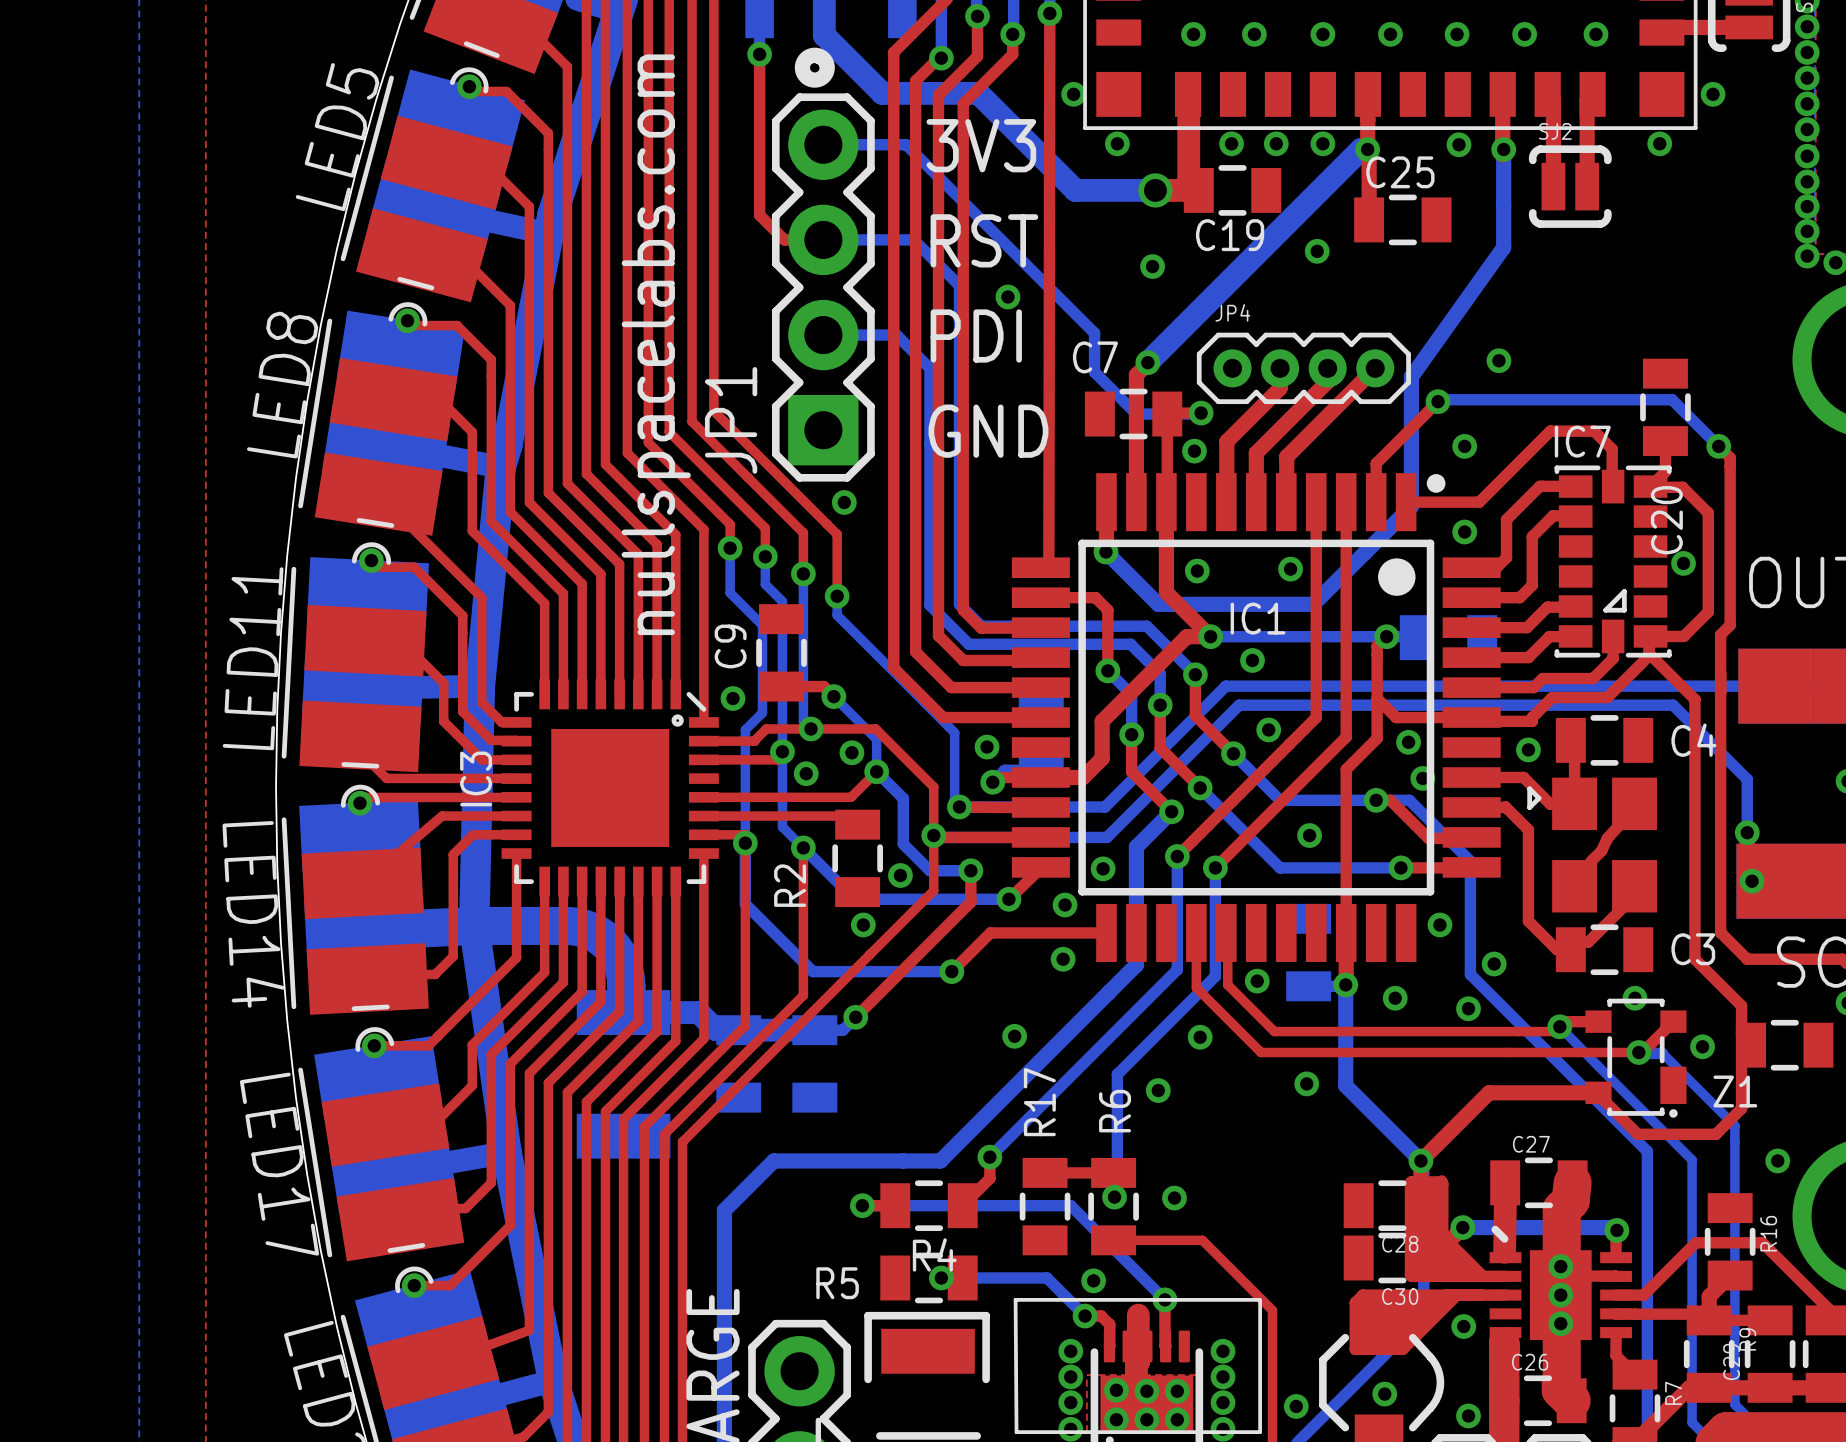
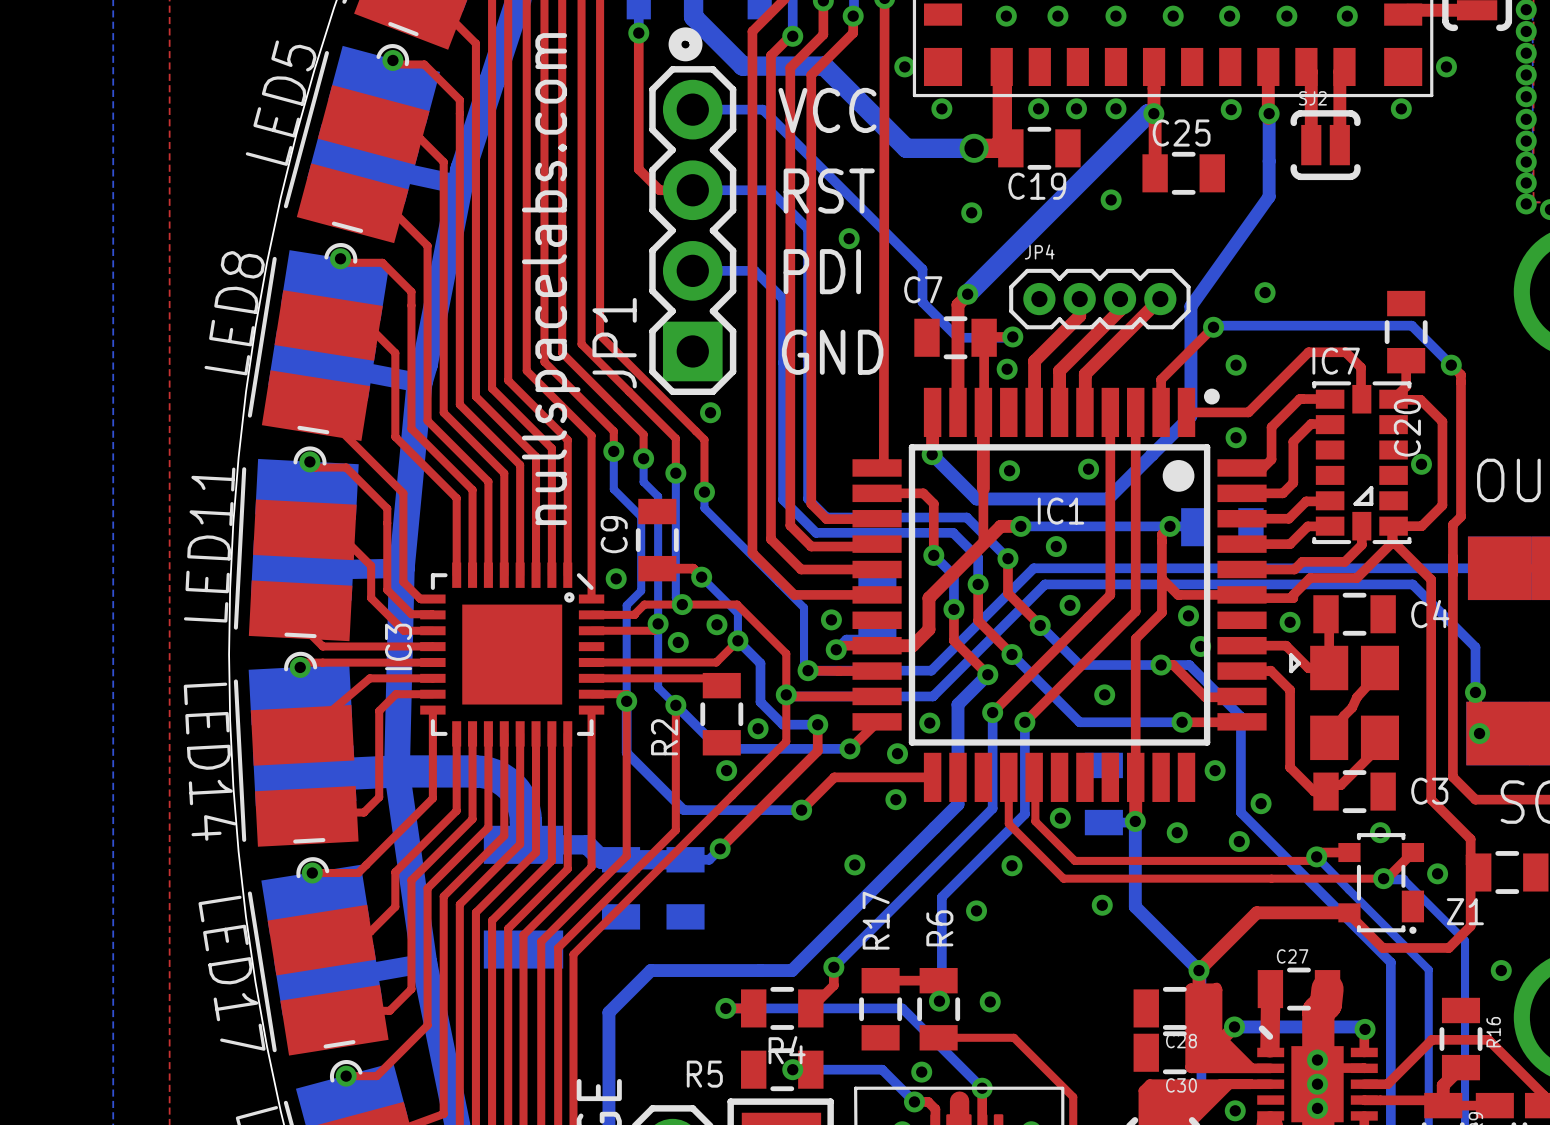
text: 3V3 (981, 145) -> VCC (827, 110)
top track: (1166, 592) (1210, 636) -> (983, 488) (983, 543)

